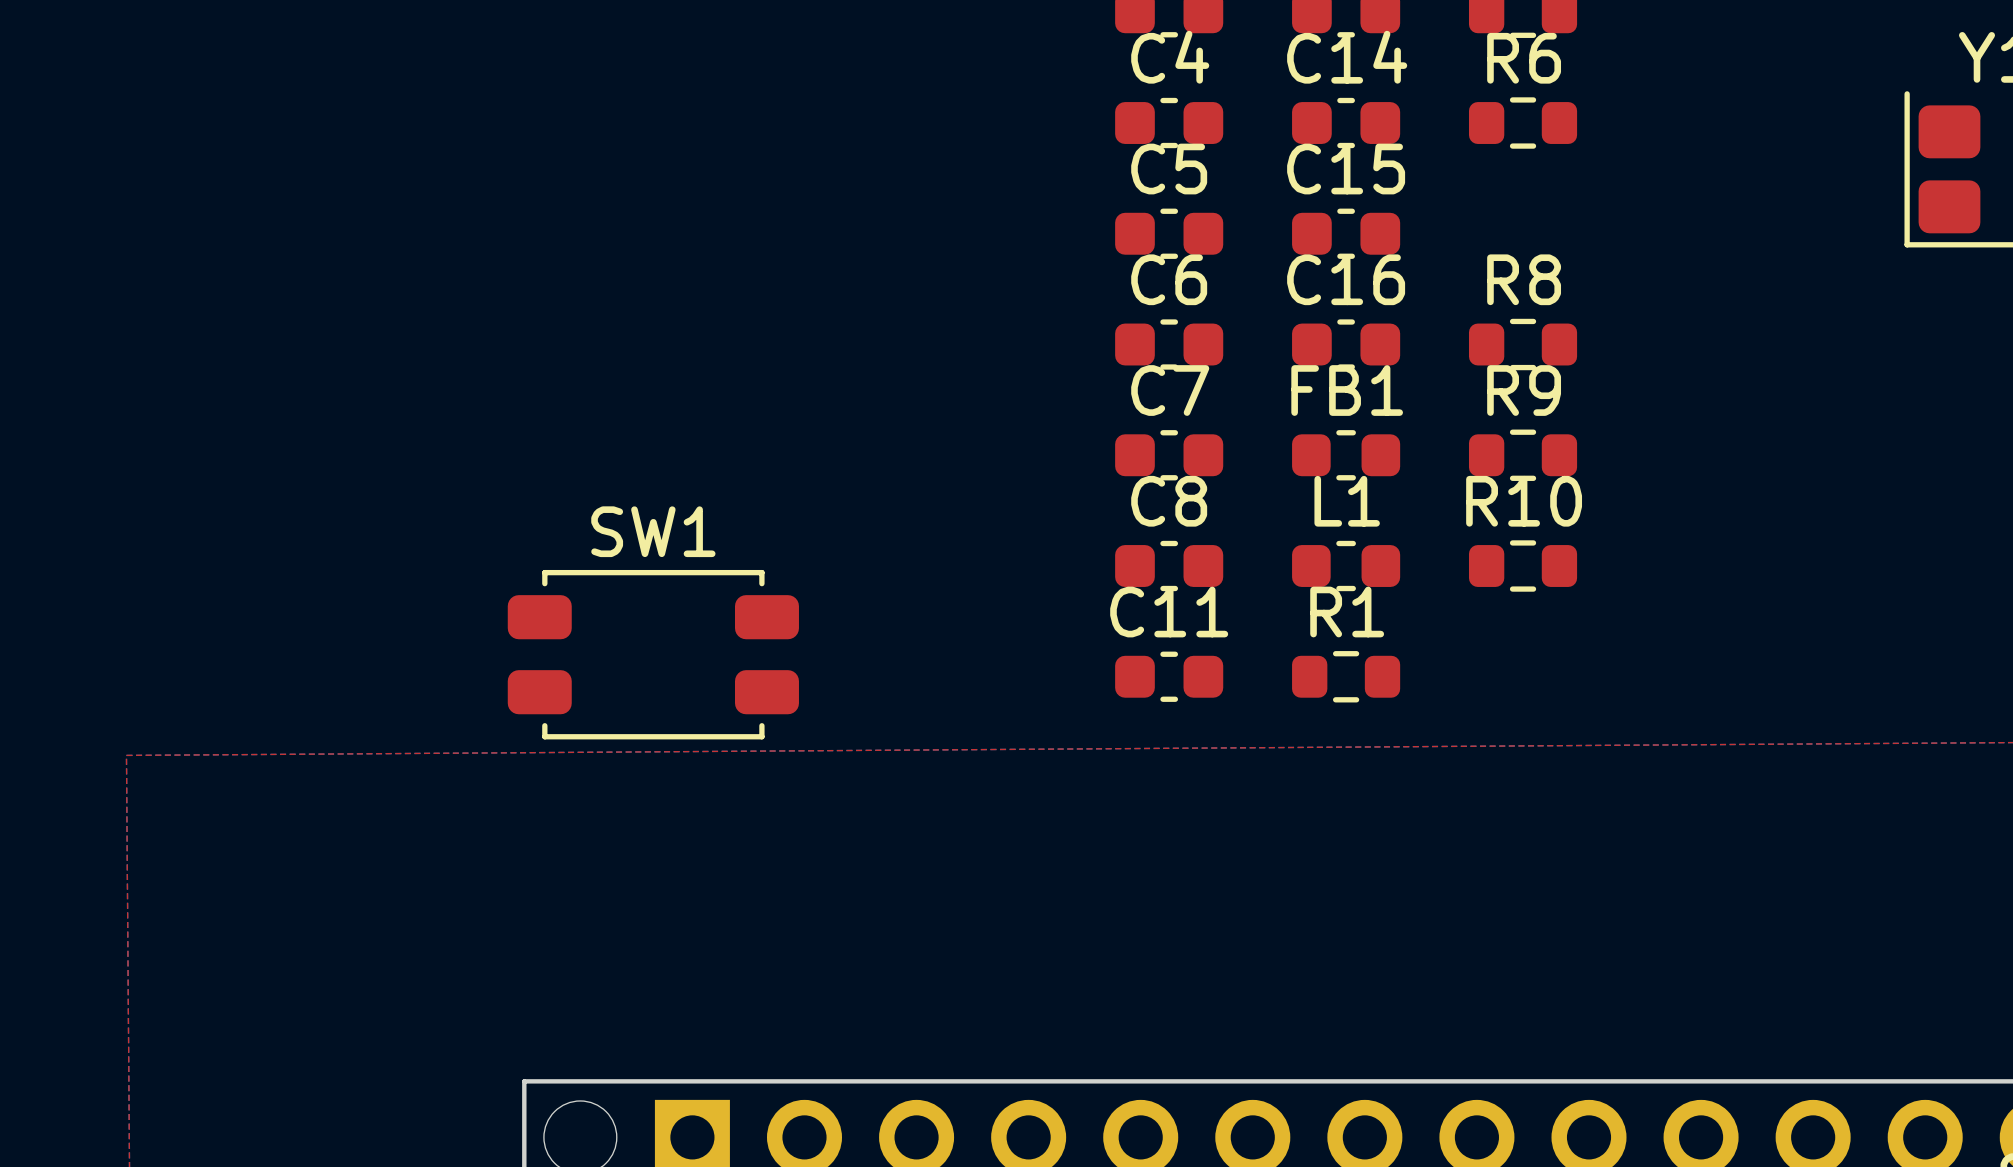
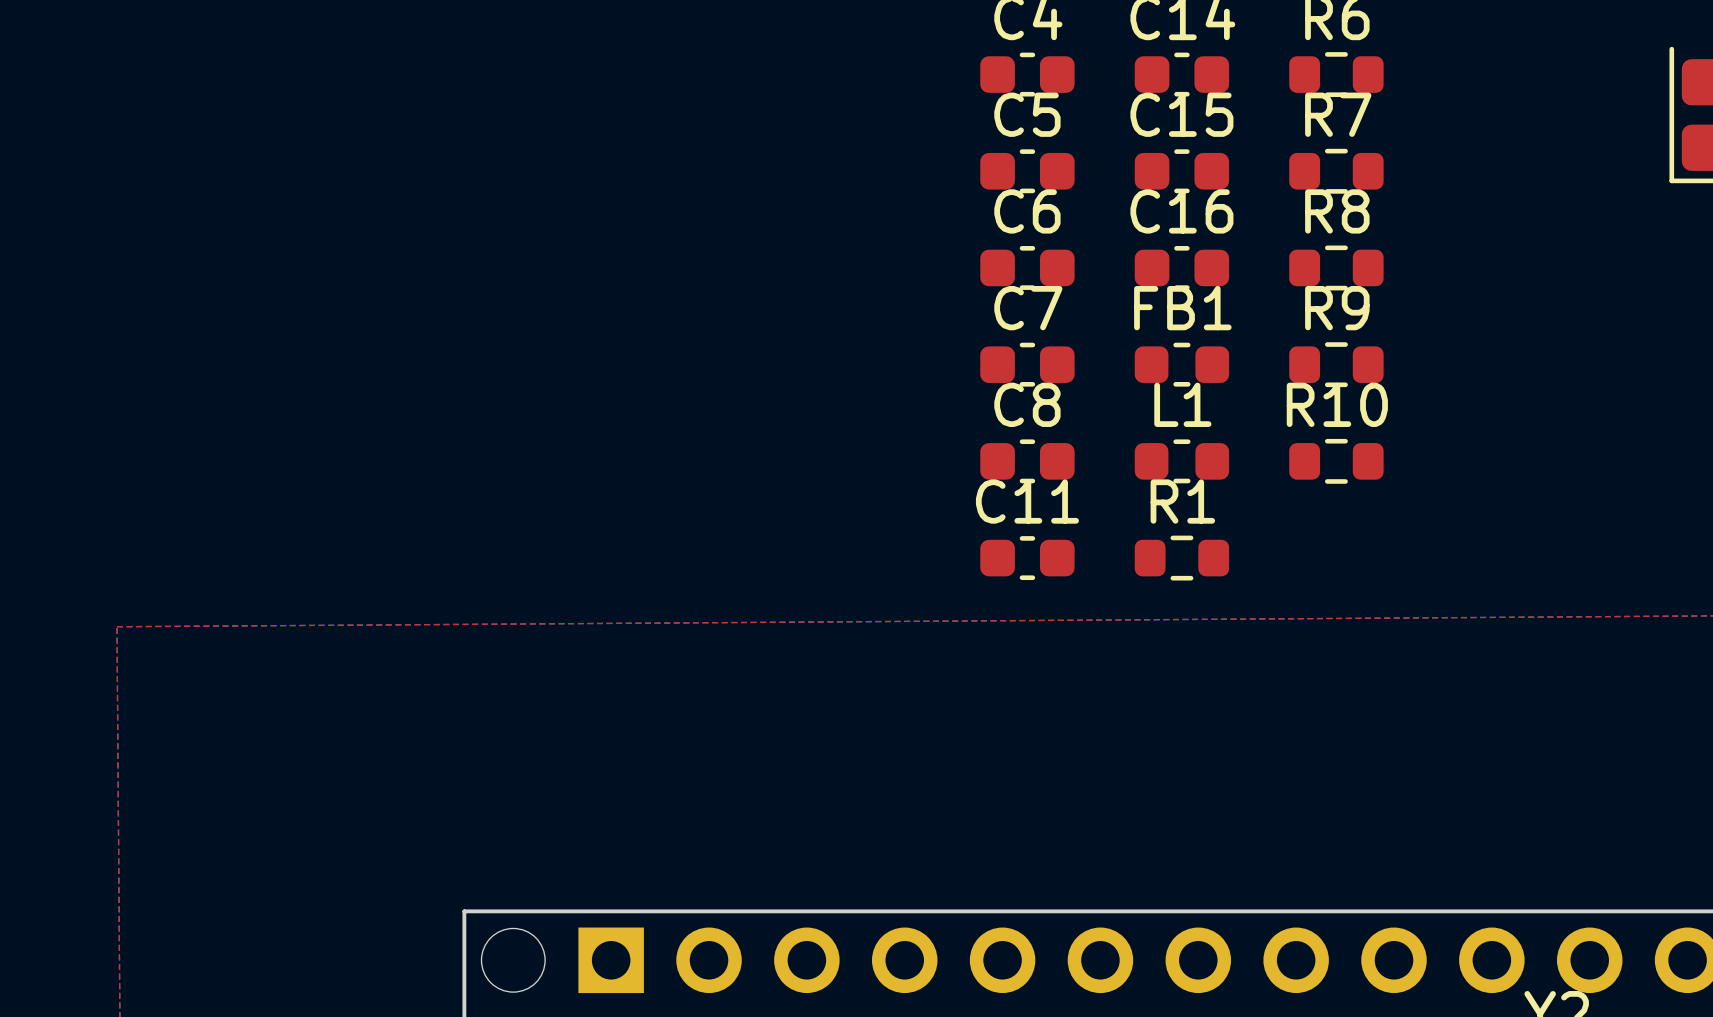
R7: none -> (1336, 171)
SW1: (653, 654) -> none

